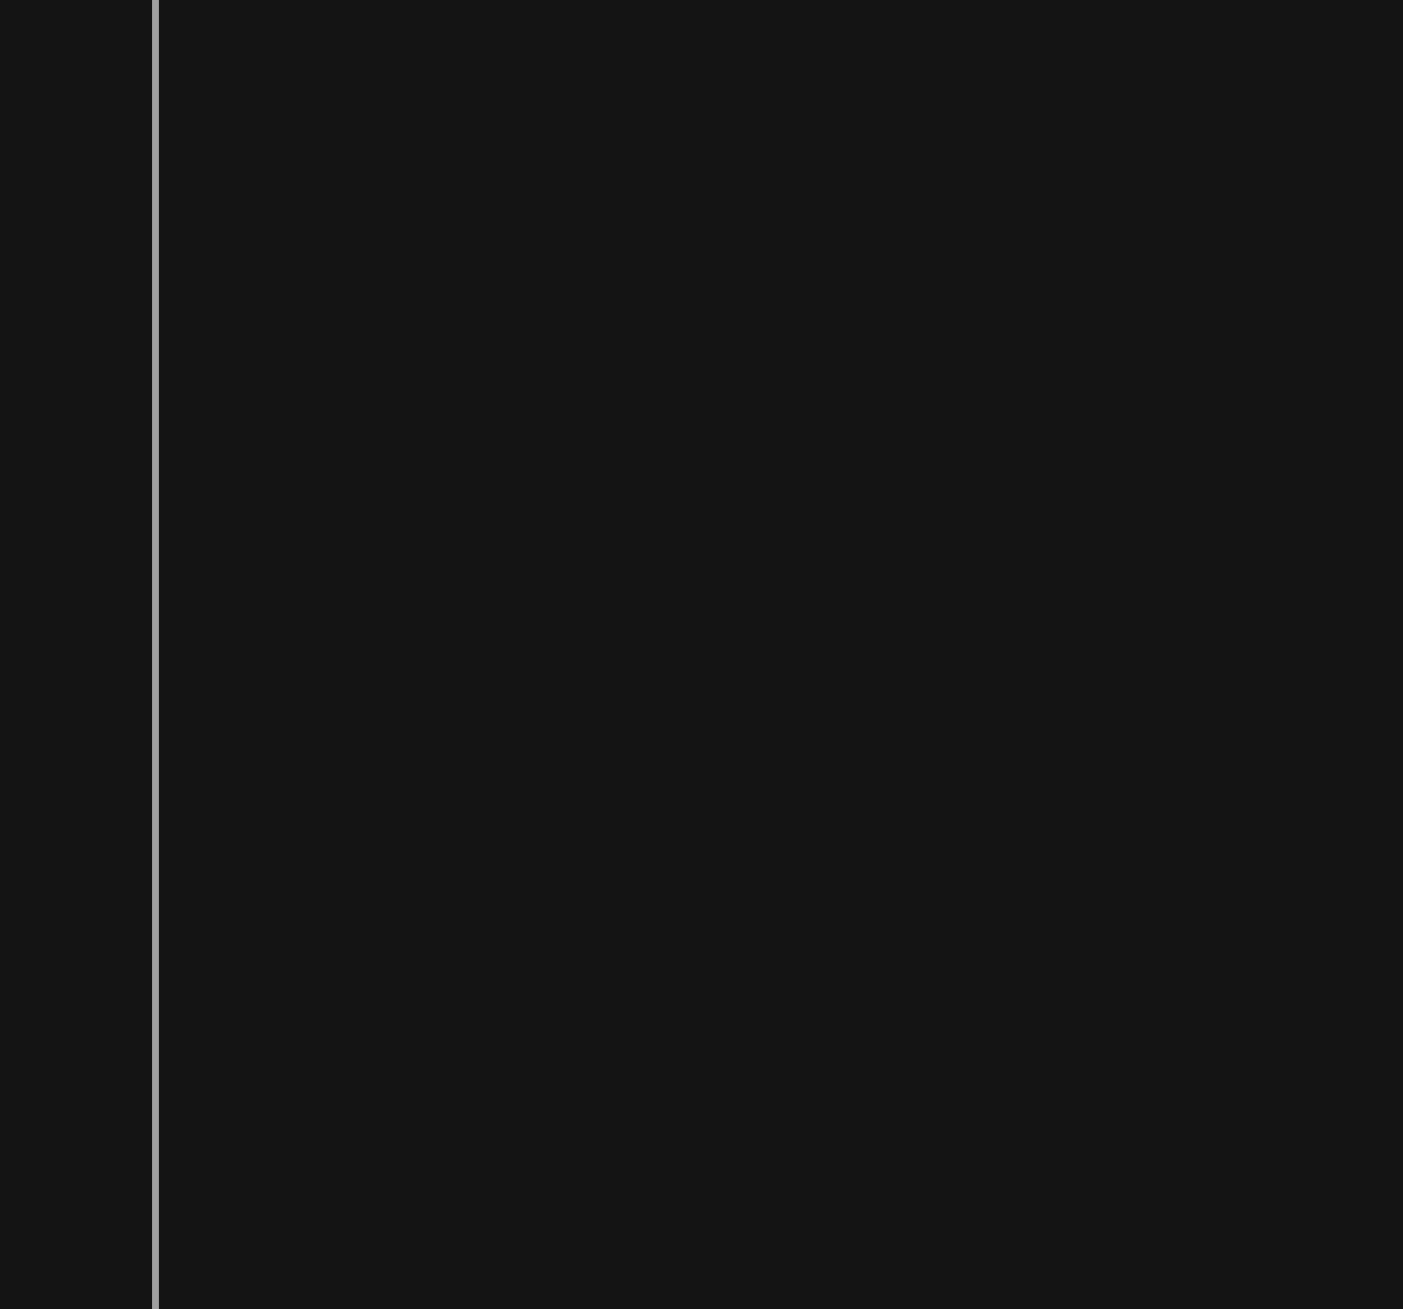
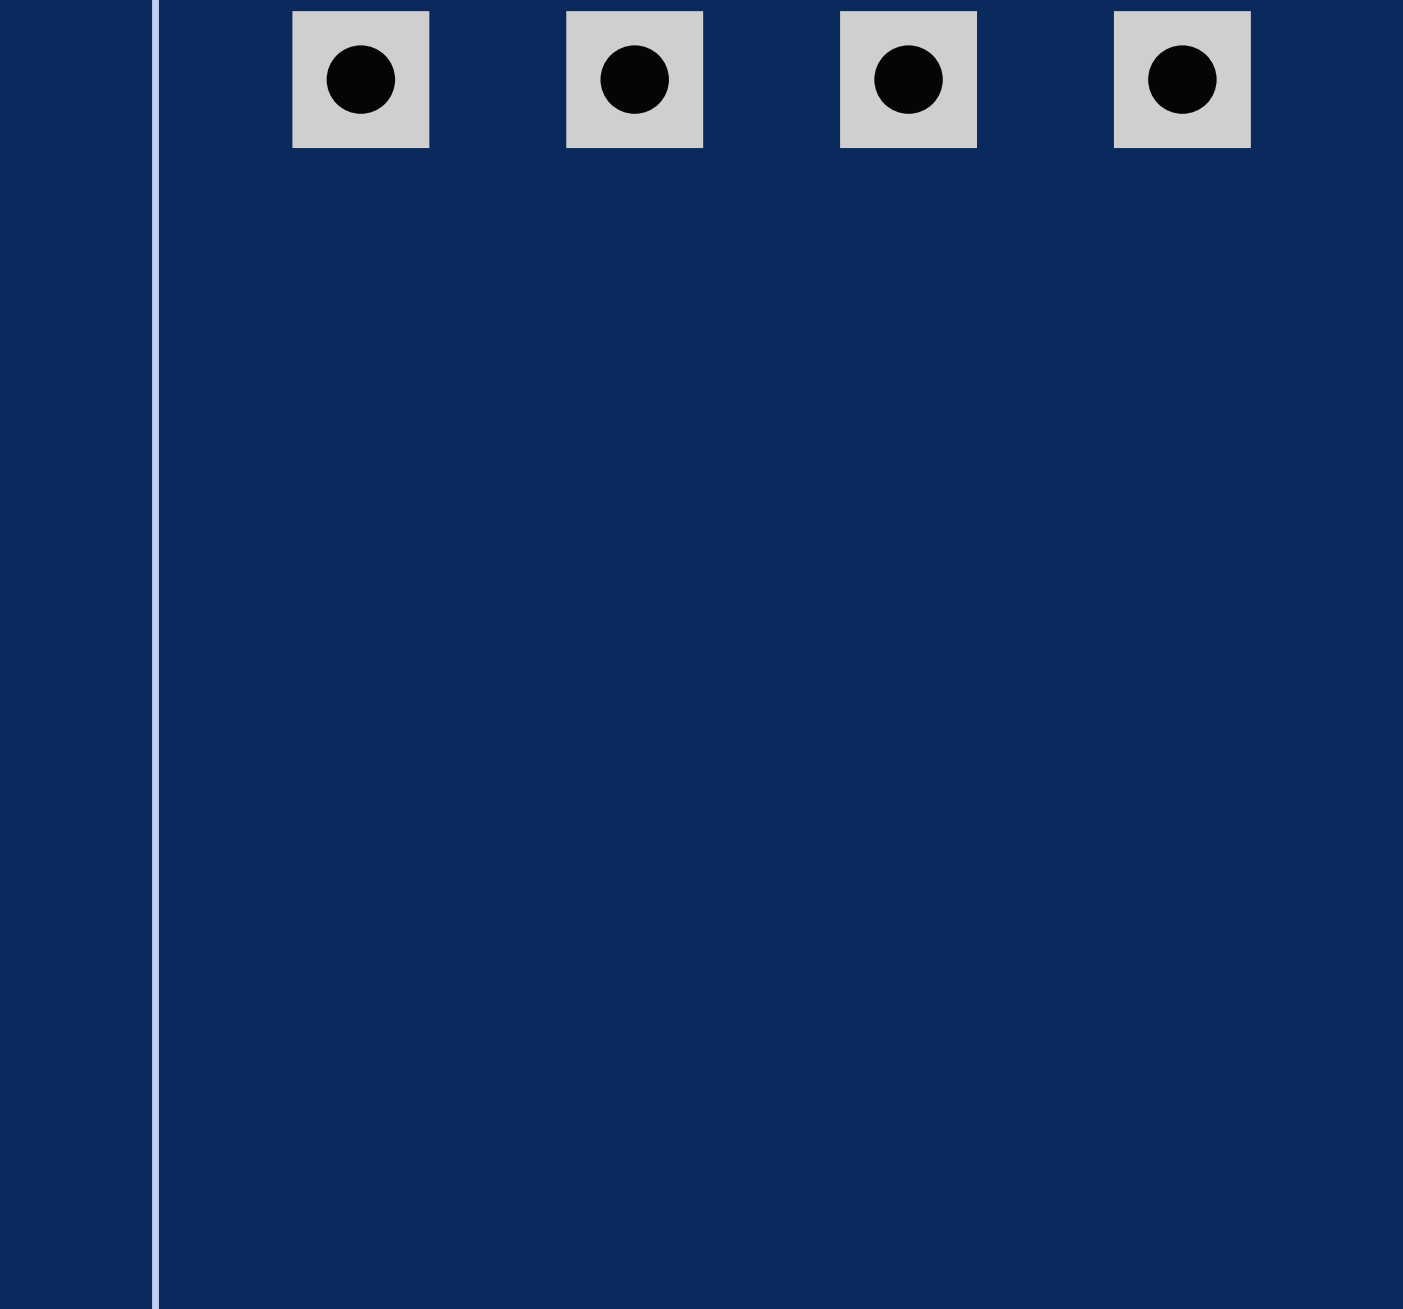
part: none -> (360, 79)
part: none -> (634, 79)
part: none -> (908, 79)
part: none -> (1182, 79)

